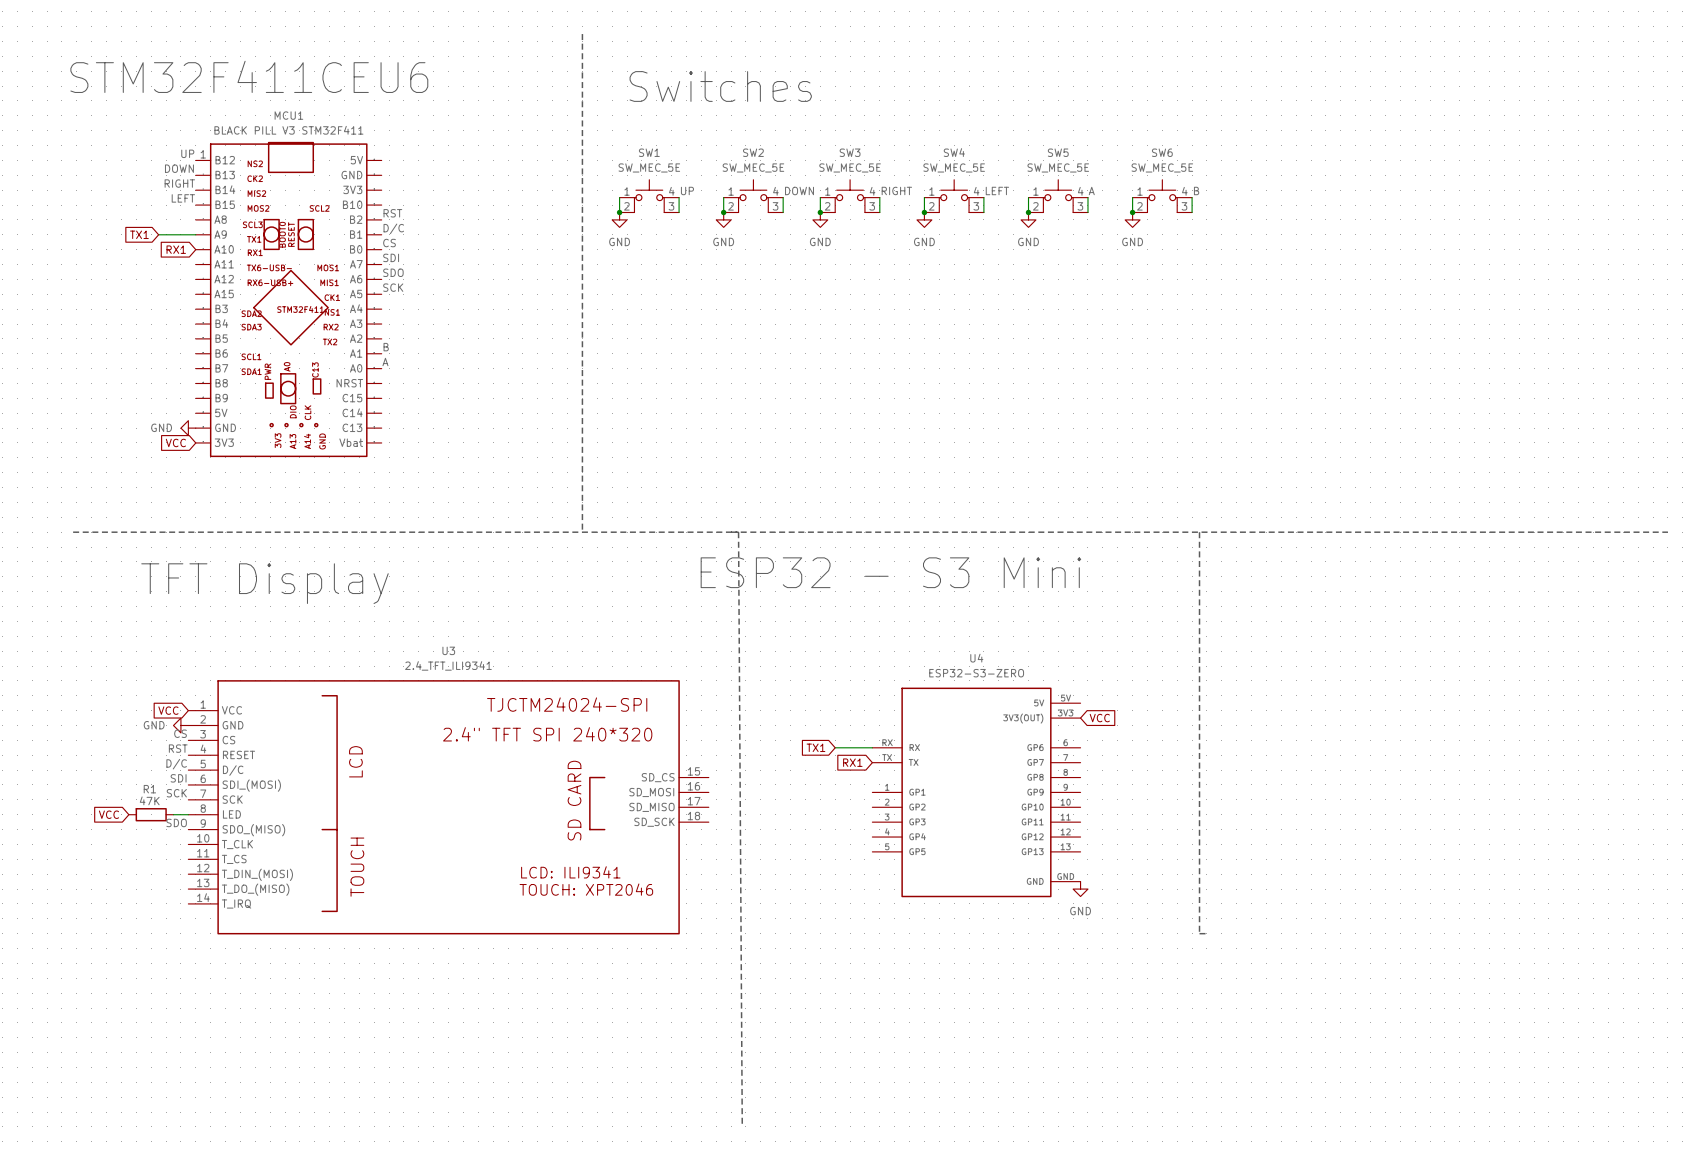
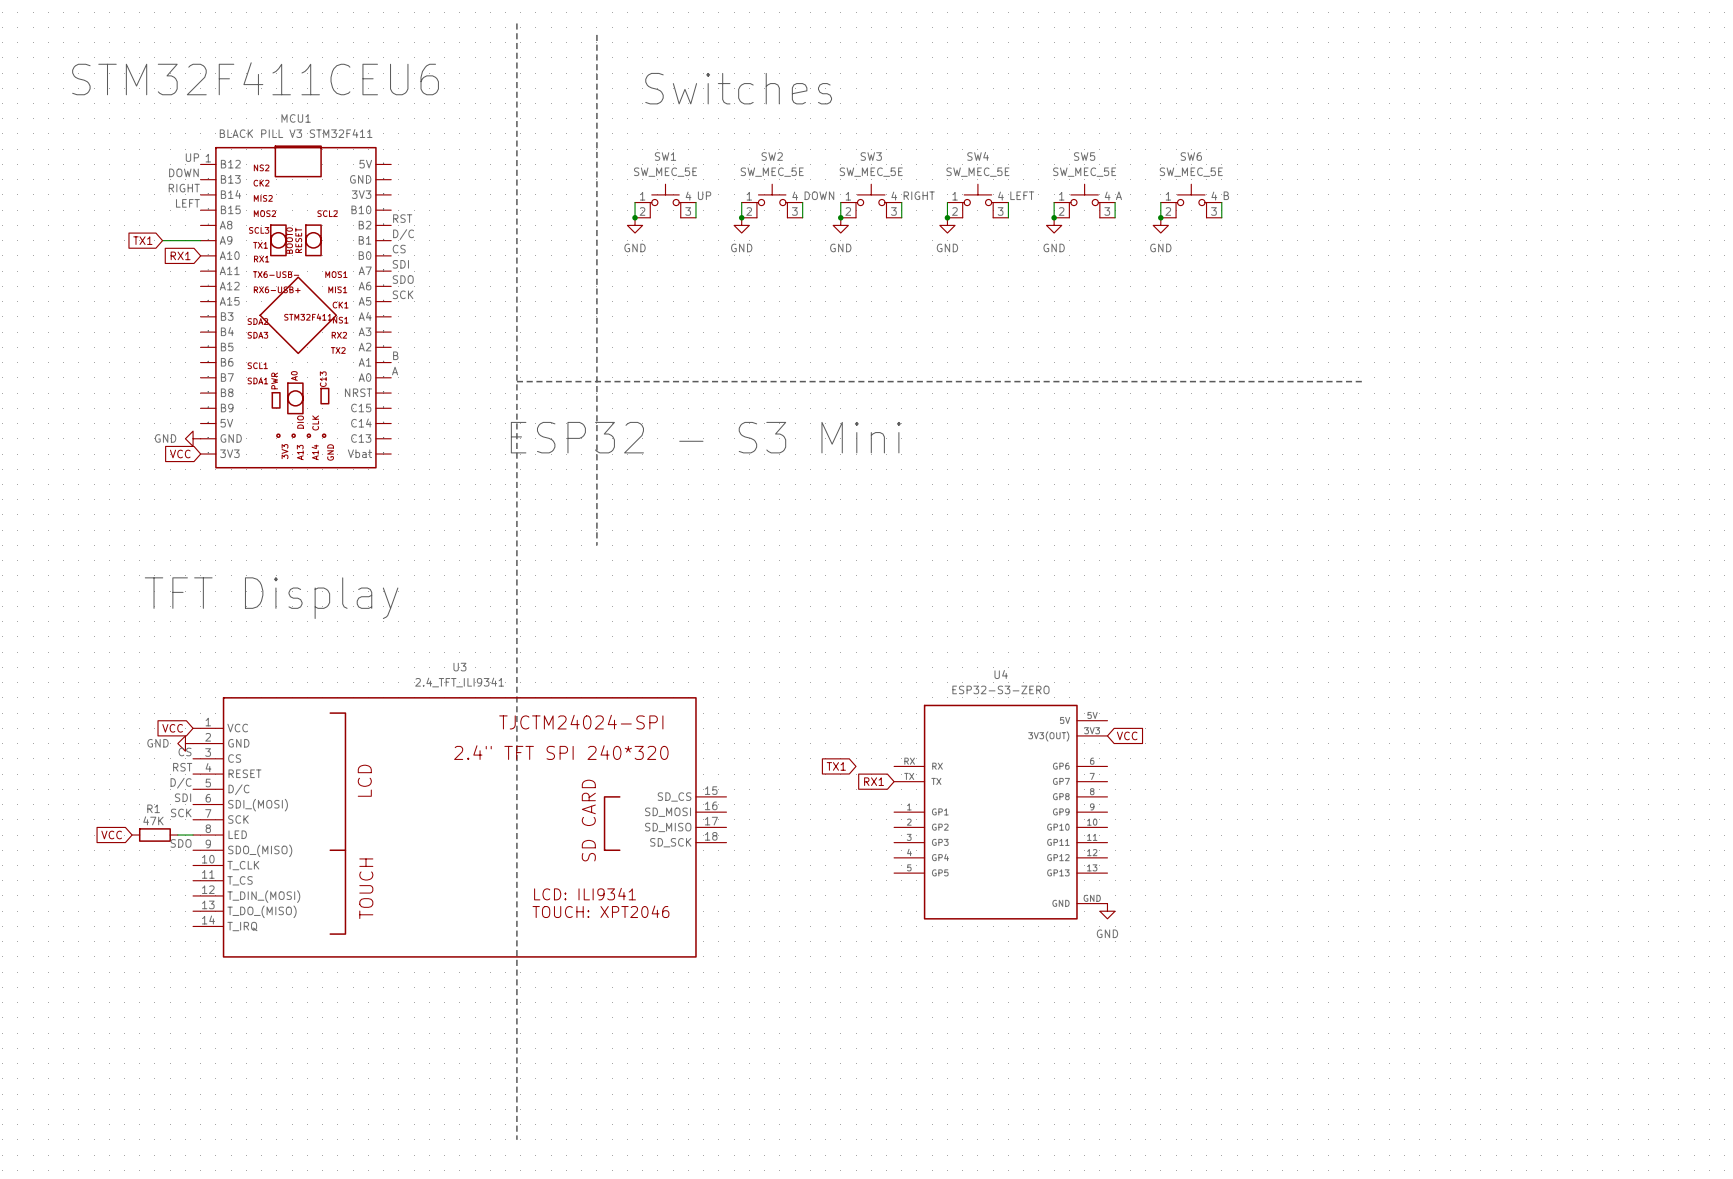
line: none -> (516, 23) (516, 1139)
line: none -> (516, 381) (1362, 381)
text: none -> ESP32 - S3 Mini (705, 437)
line: (73, 532) (1667, 532) -> none
line: (738, 532) (742, 1126) -> none
line: (1199, 532) (1199, 933) (1206, 933) -> none
text: ESP32 - S3 Mini (890, 572) -> none
wire: (835, 747) (872, 747) -> none

